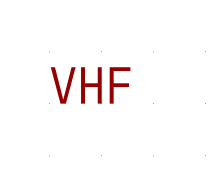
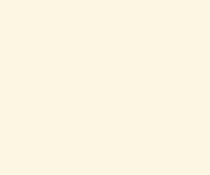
text: VHF (90, 85) -> none

